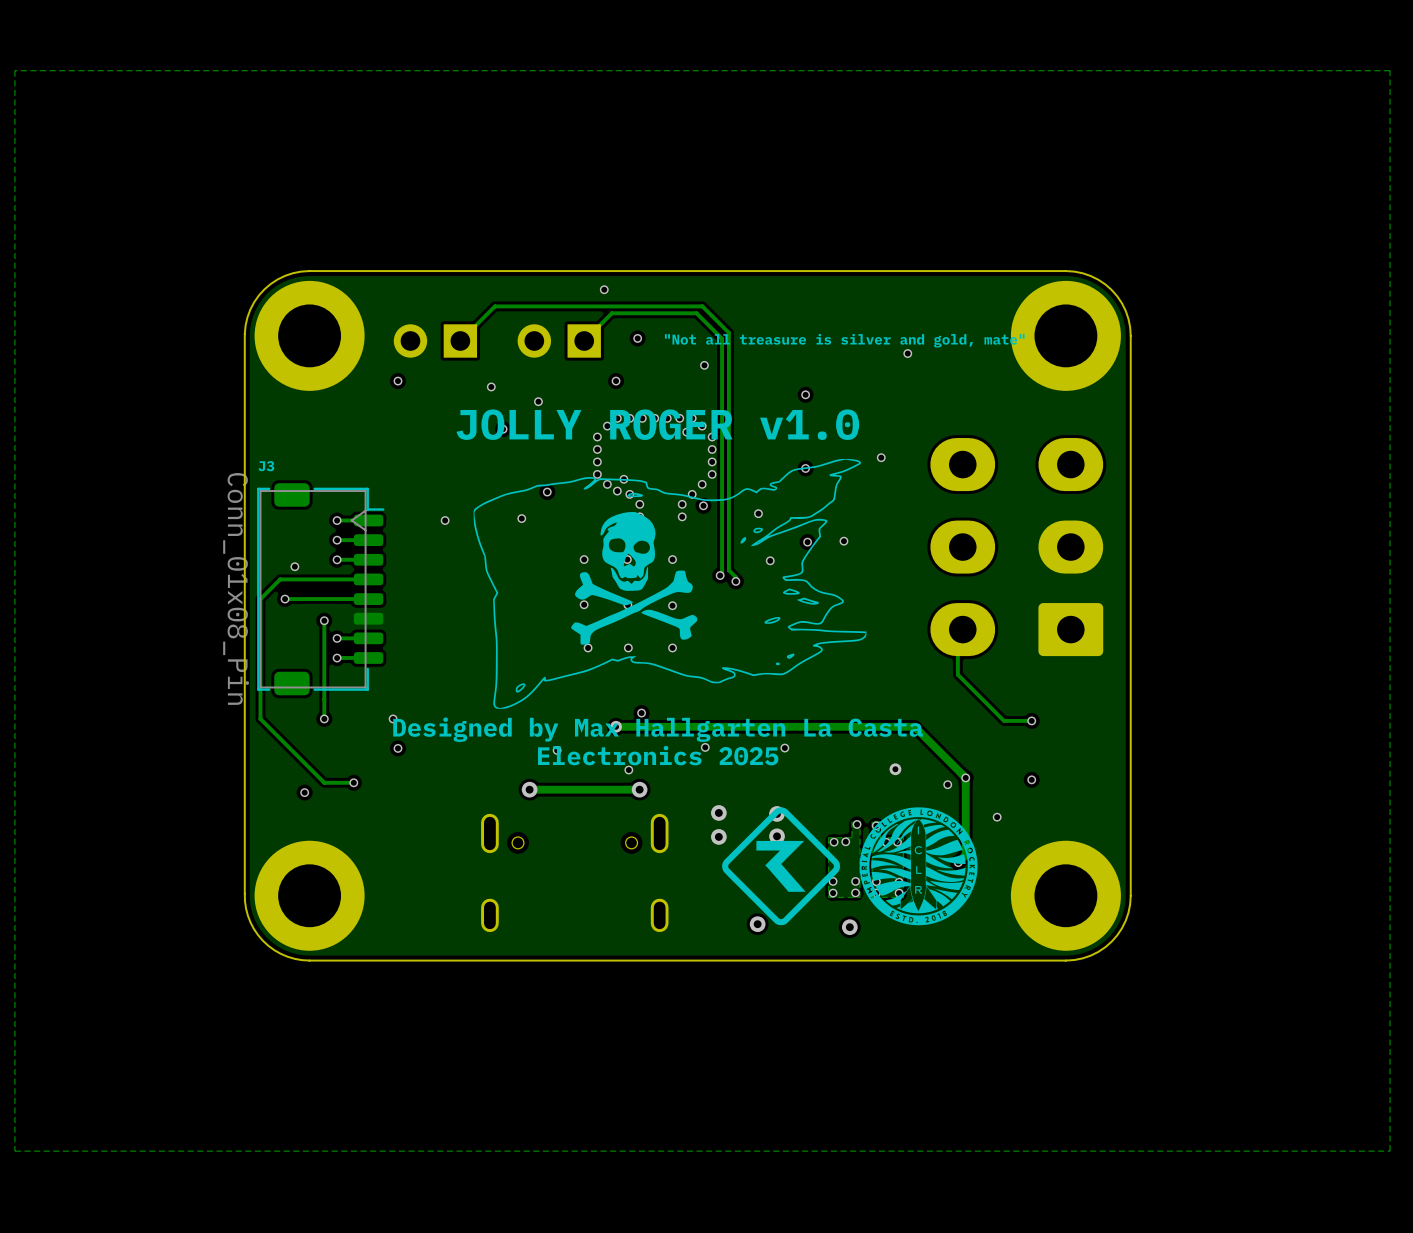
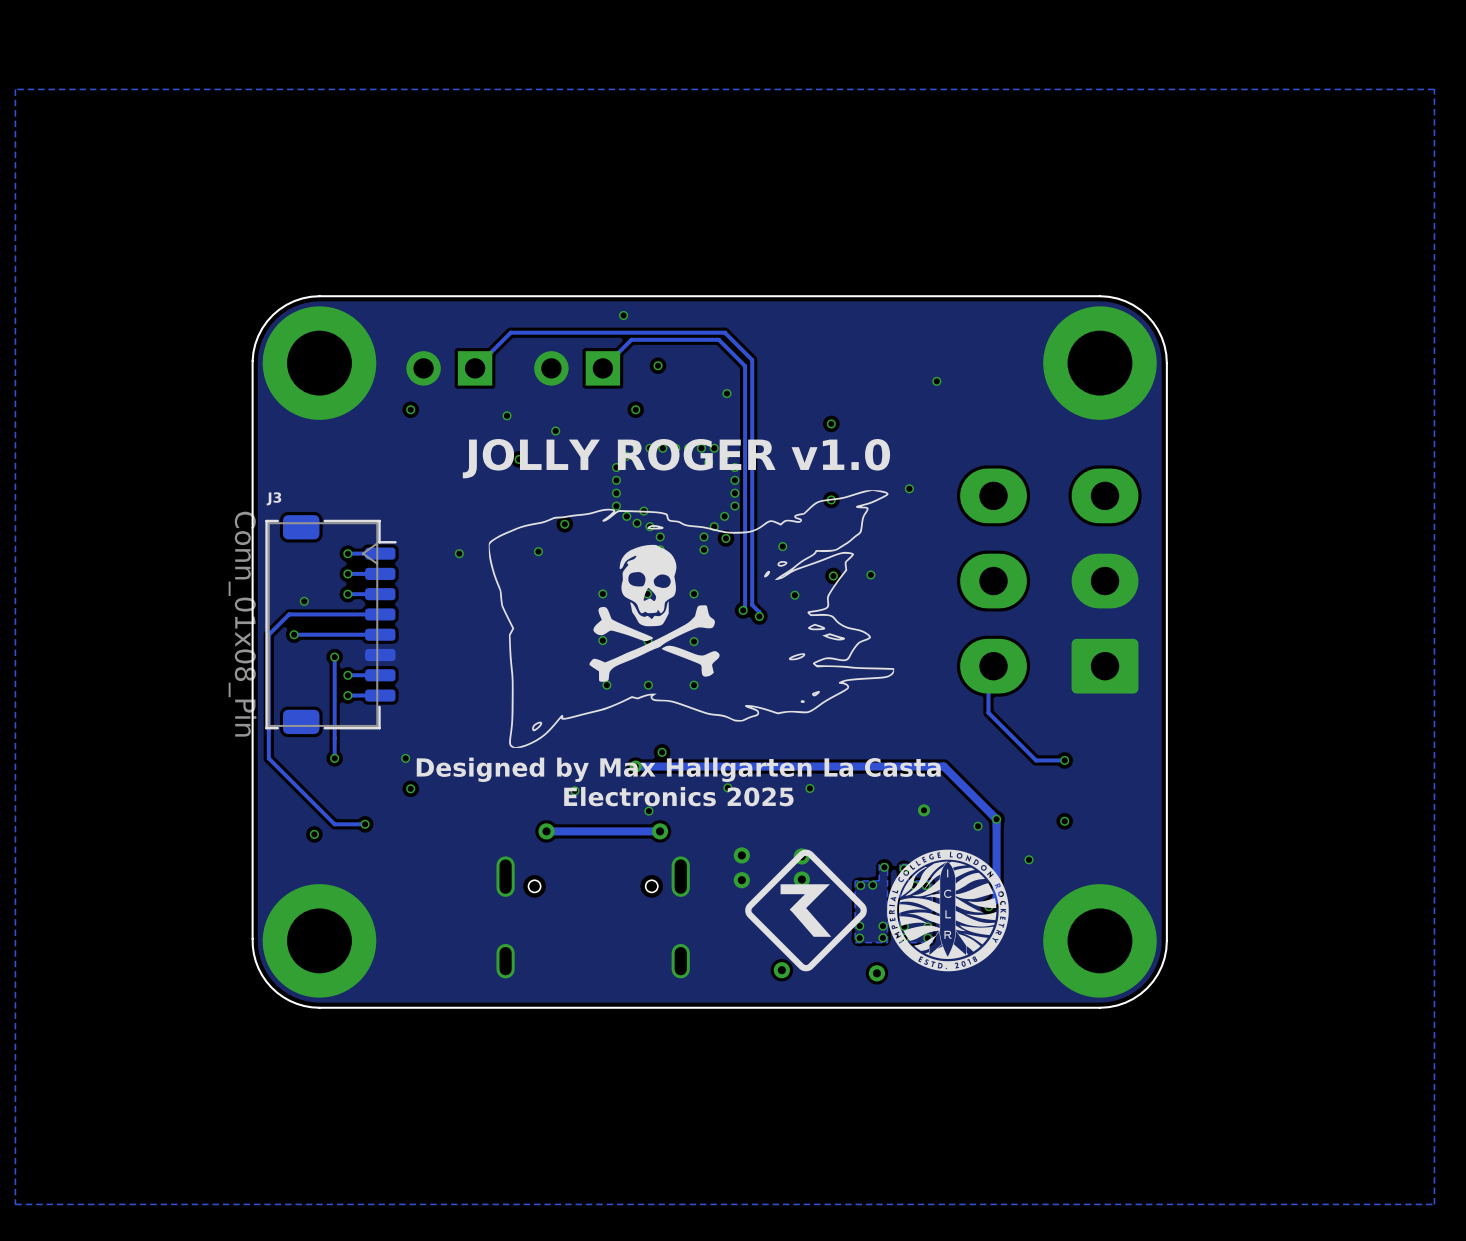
text: "Not all treasure is silver and gold, mate" (844, 340) -> none

